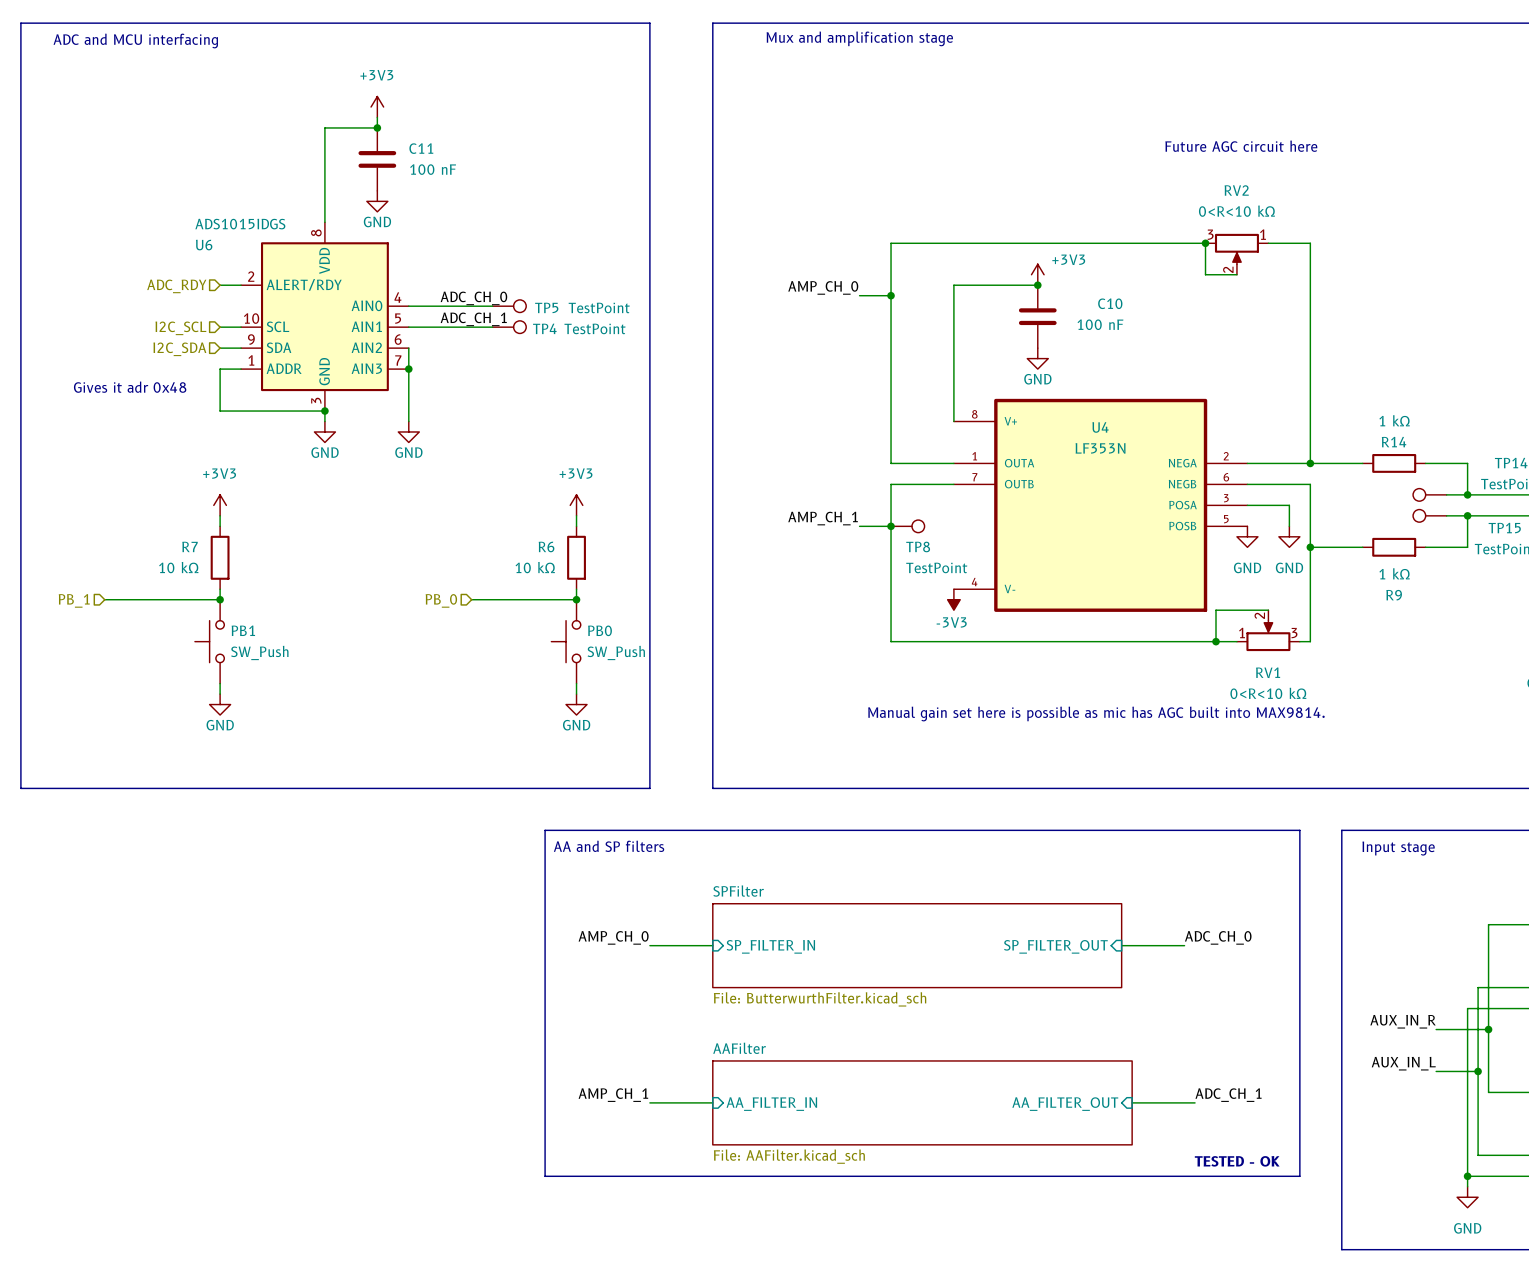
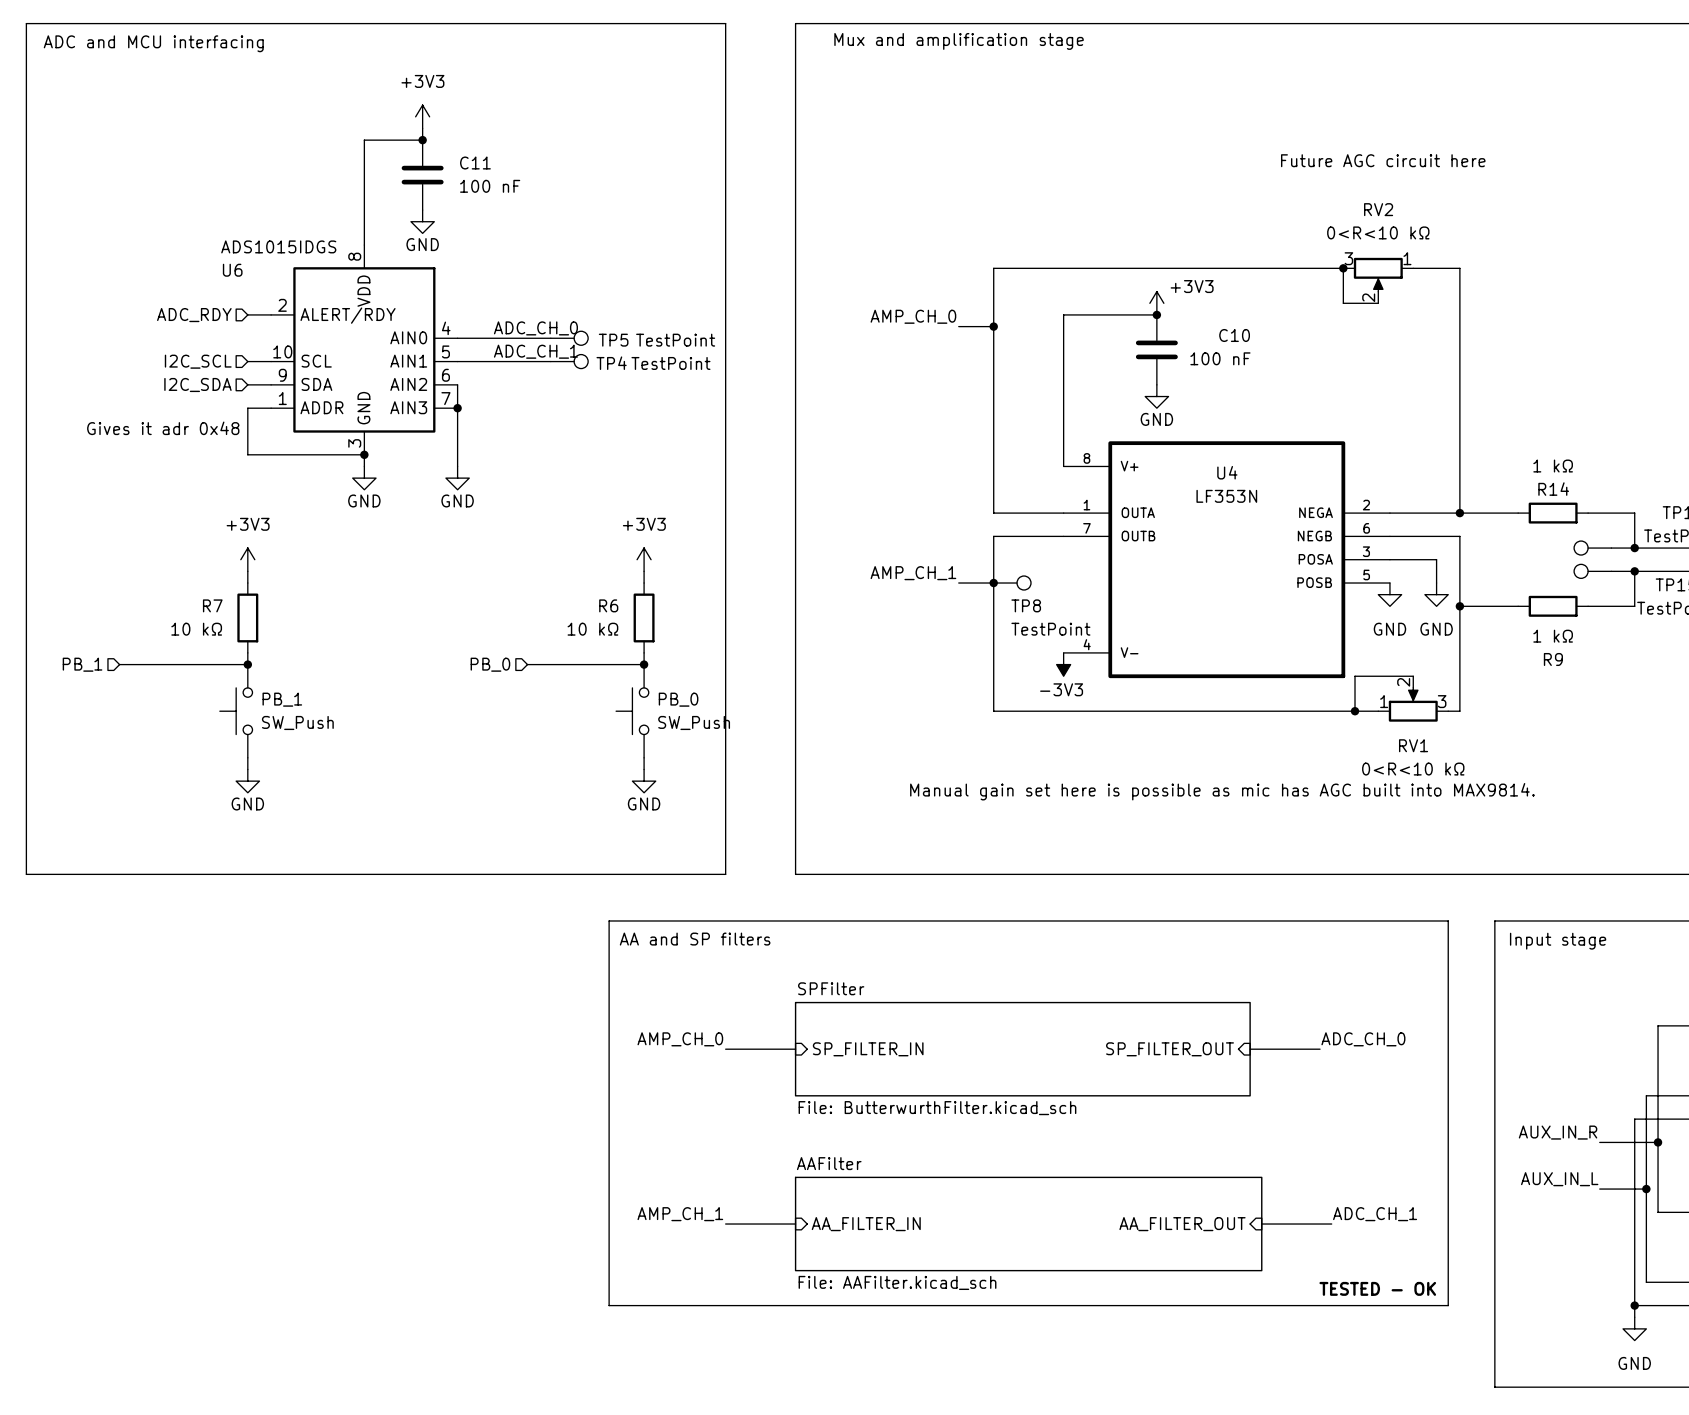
PB1 name: PB1 (243, 630) -> PB_1 (282, 699)
PB0 name: PB0 (599, 630) -> PB_0 (678, 699)

